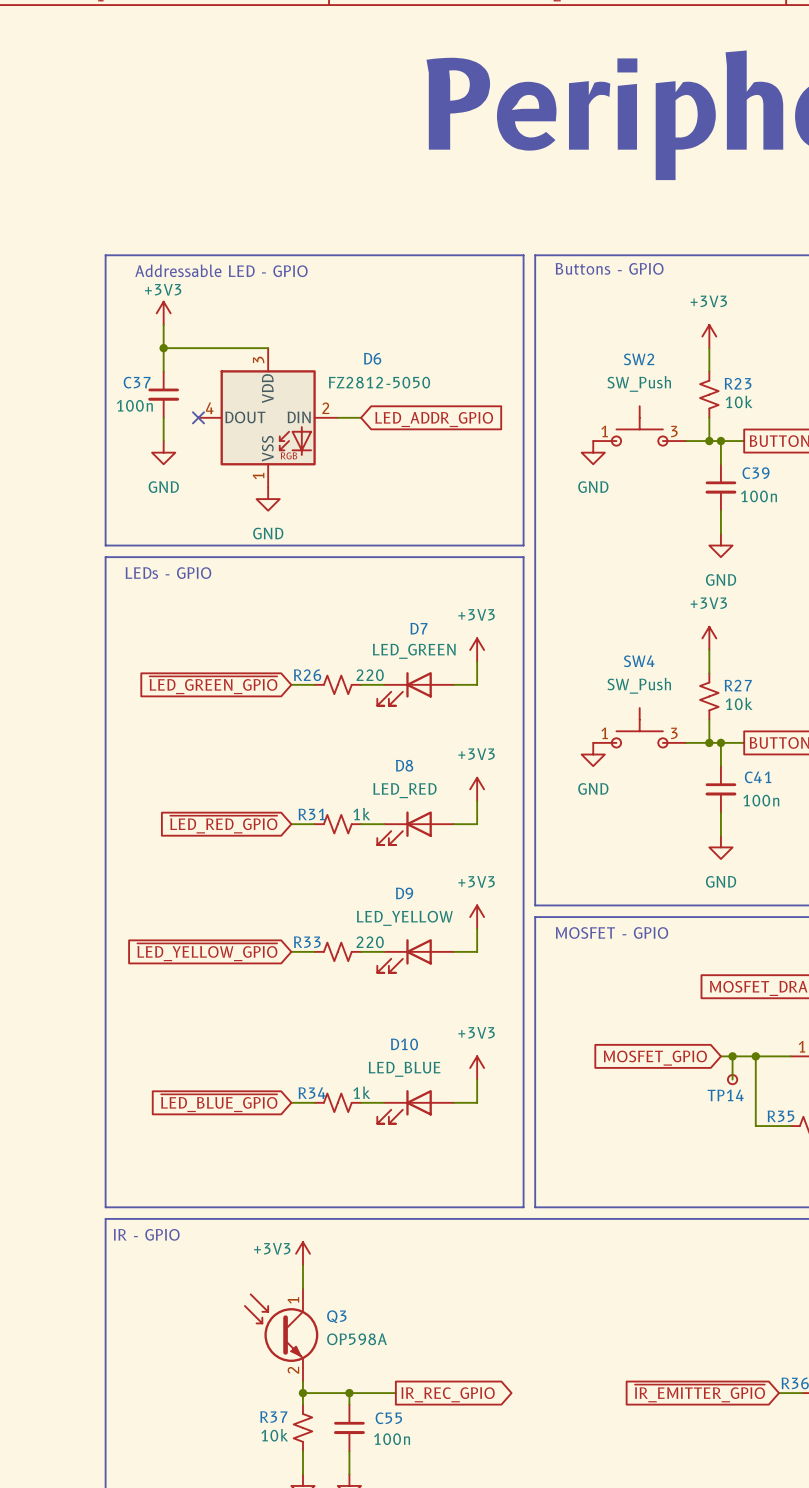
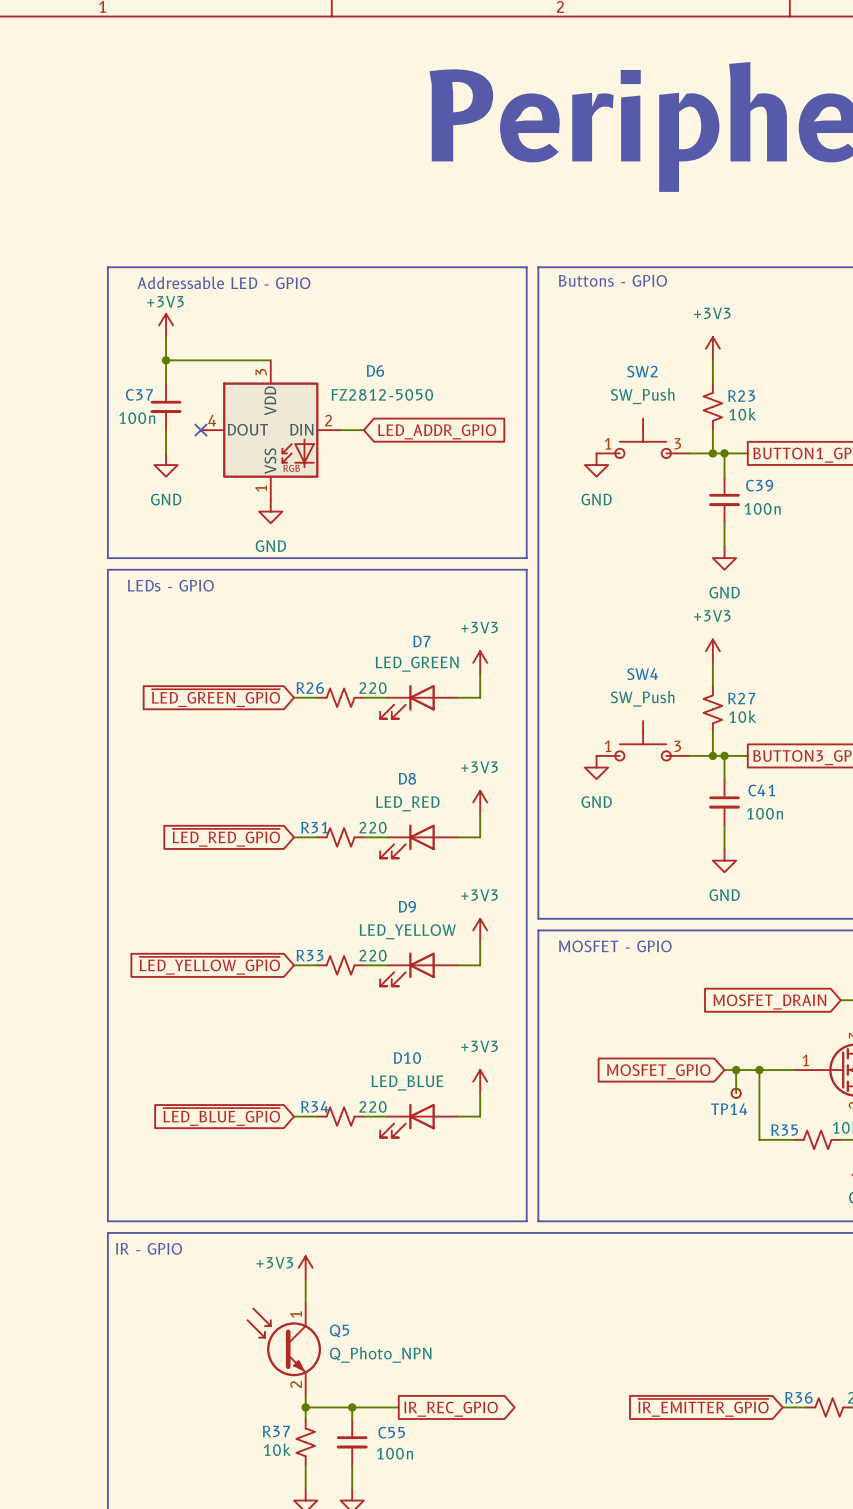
R31 value: 1k (361, 814) -> 220 (373, 827)
R34 value: 1k (361, 1092) -> 220 (373, 1106)
Q3 name: Q3 (336, 1316) -> Q5 (339, 1330)
Q3 value: OP598A (356, 1339) -> Q_Photo_NPN (380, 1354)

